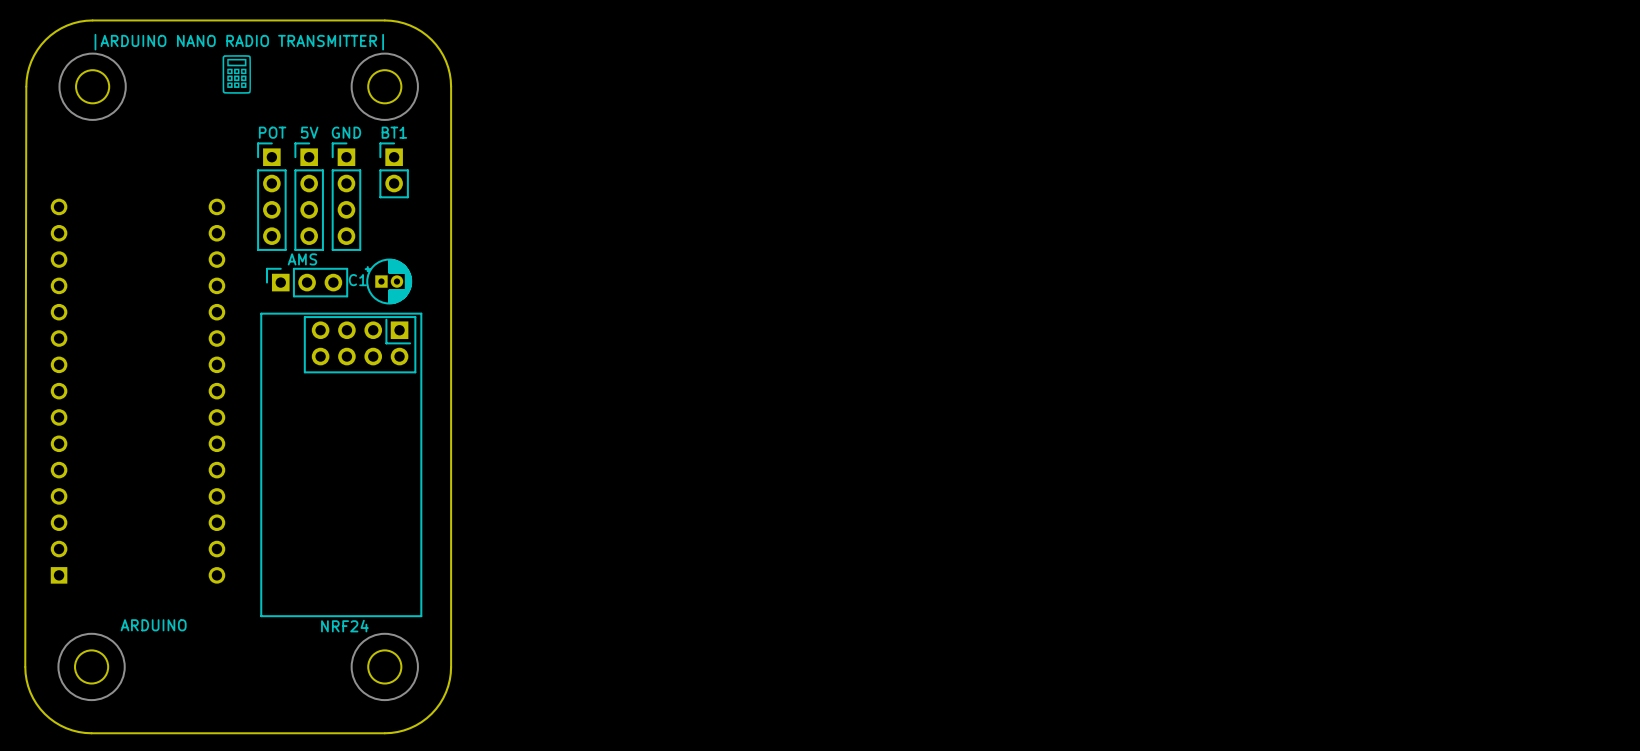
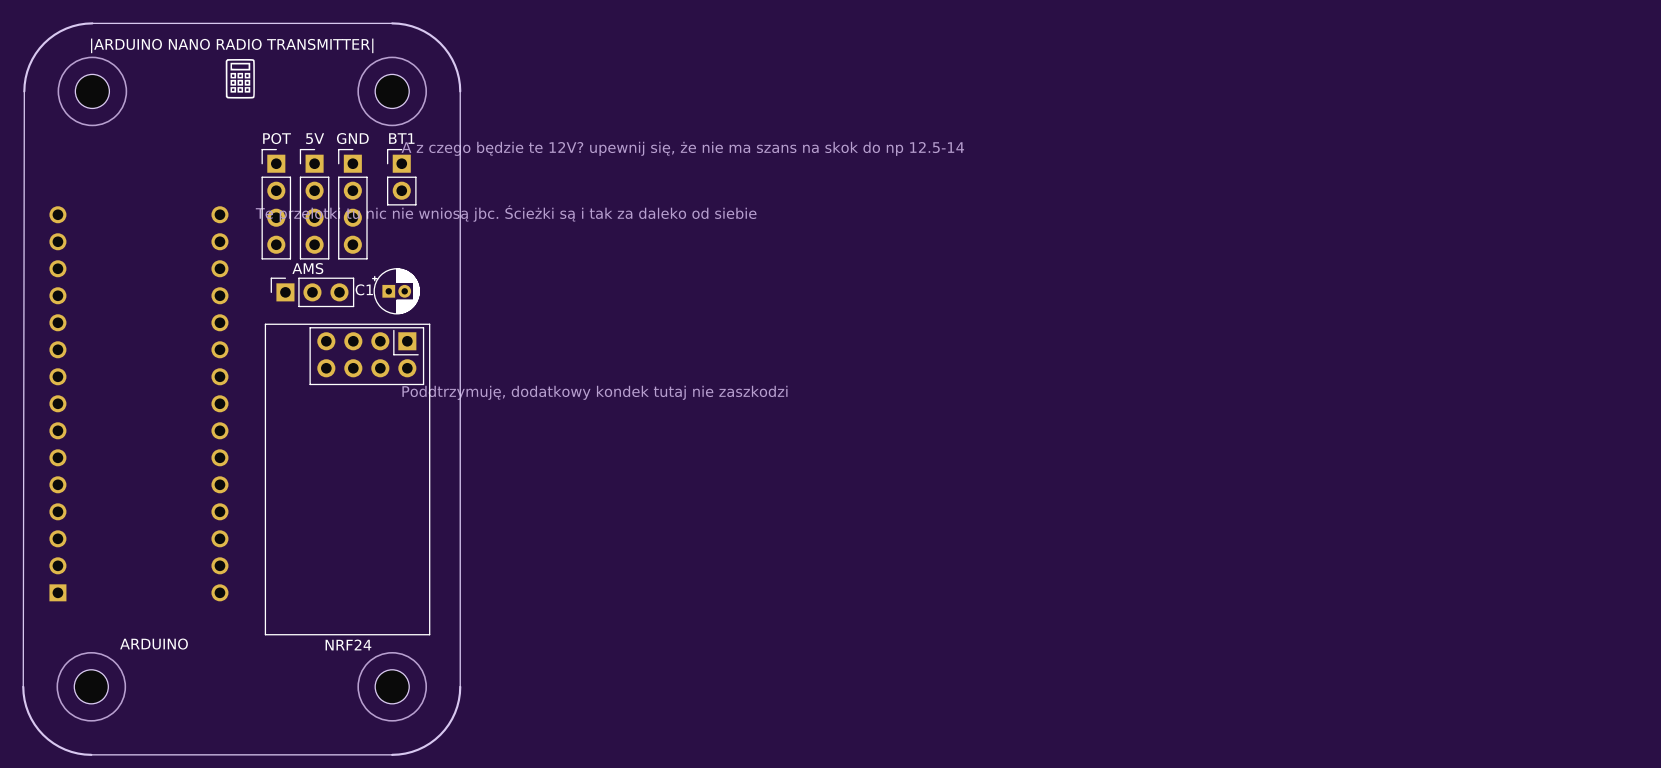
text: none -> A z czego będzie te 12V? upewnij się, że nie ma szans na skok do np 12.5-14 (682, 148)
text: none -> Te przelotki tu nic nie wniosą jbc. Ścieżki są i tak za daleko od siebie (506, 213)
text: none -> Poddtrzymuję, dodatkowy kondek tutaj nie zaszkodzi (594, 392)

